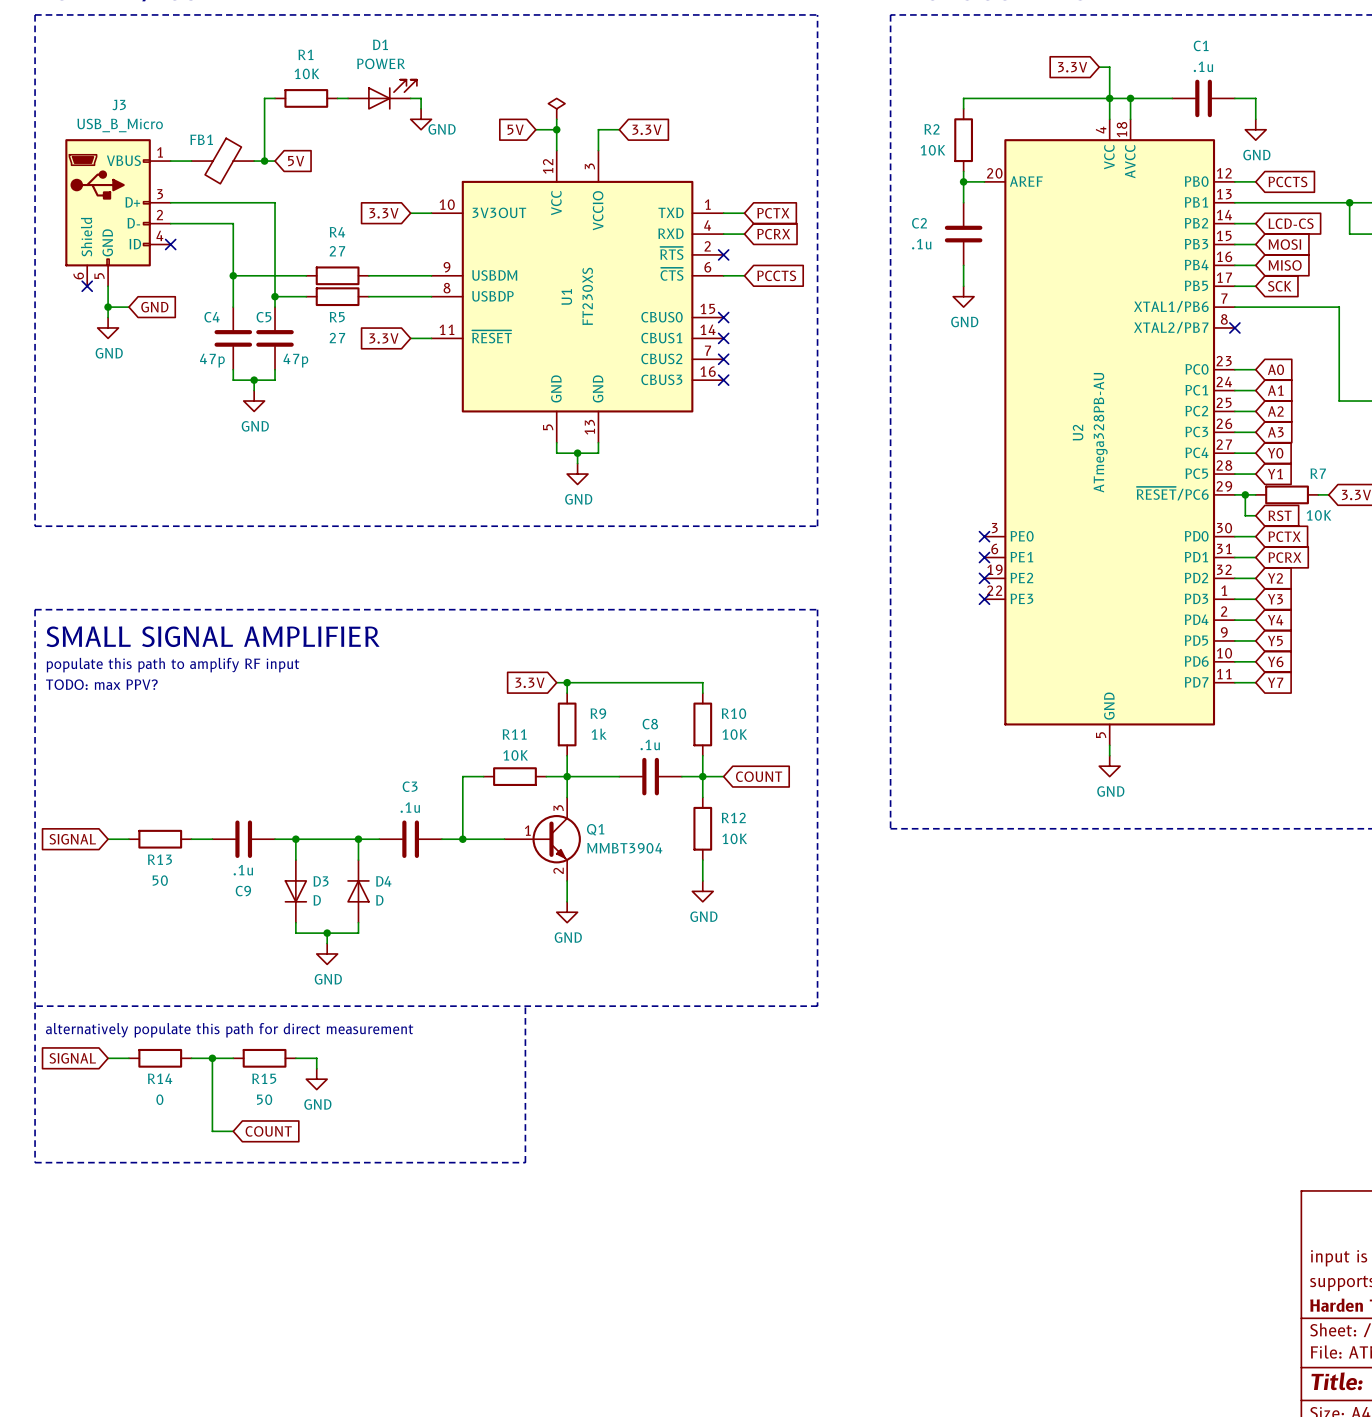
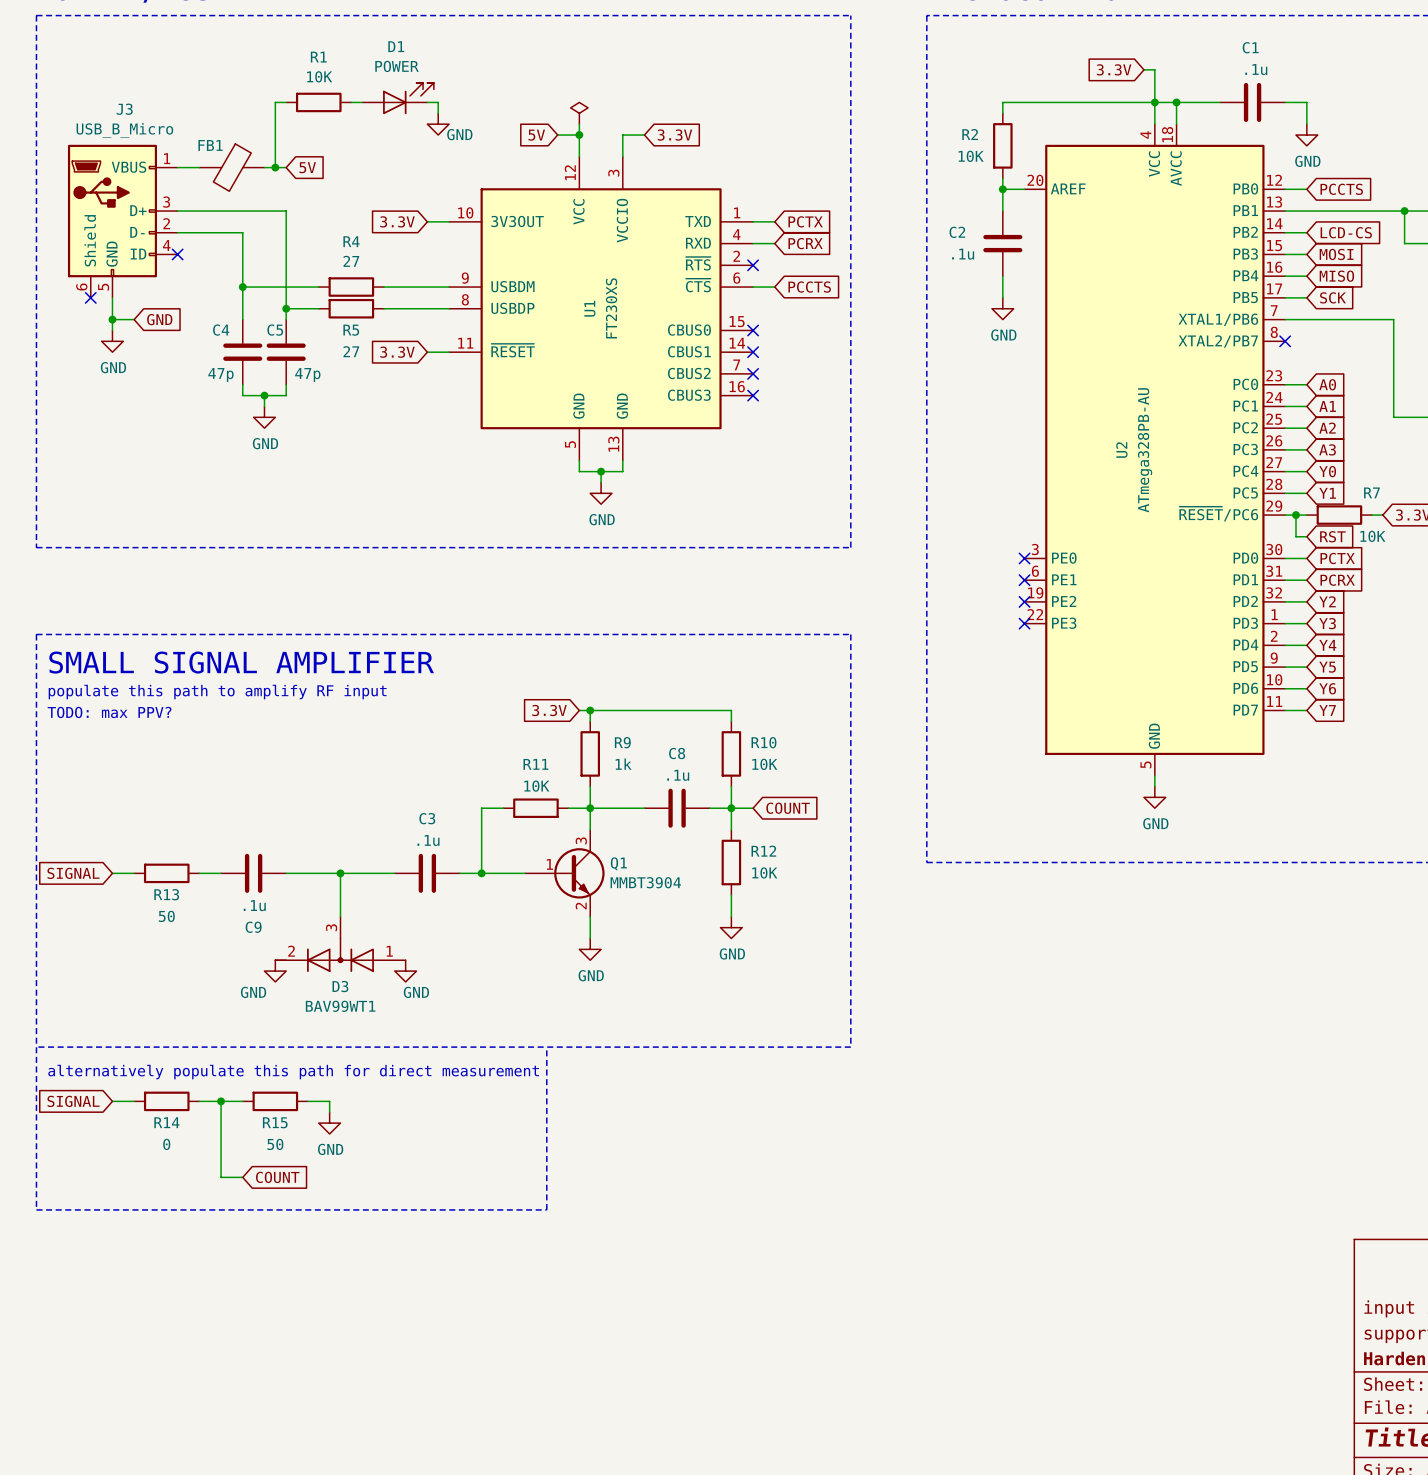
wire: (295, 839) (295, 860) -> none
junction: (295, 839) -> none
wire: none -> (340, 873) (340, 916)
junction: none -> (340, 873)
wire: (358, 839) (358, 860) -> none
junction: (358, 839) -> none
D3 symbol: [284, 860, 308, 923] -> [275, 916, 406, 972]
D3 name position: D3 (321, 881) -> D3 (340, 986)
D4: D (358, 891) -> none
D3 value: D (317, 900) -> BAV99WT1 (340, 1006)
wire: (295, 922) (295, 933) (358, 933) (358, 922) -> none
power symbol: none -> GND (275, 971)
wire: (327, 933) (327, 943) -> none
junction: (327, 933) -> none
power symbol: none -> GND (405, 971)
power symbol: GND (327, 953) -> none

